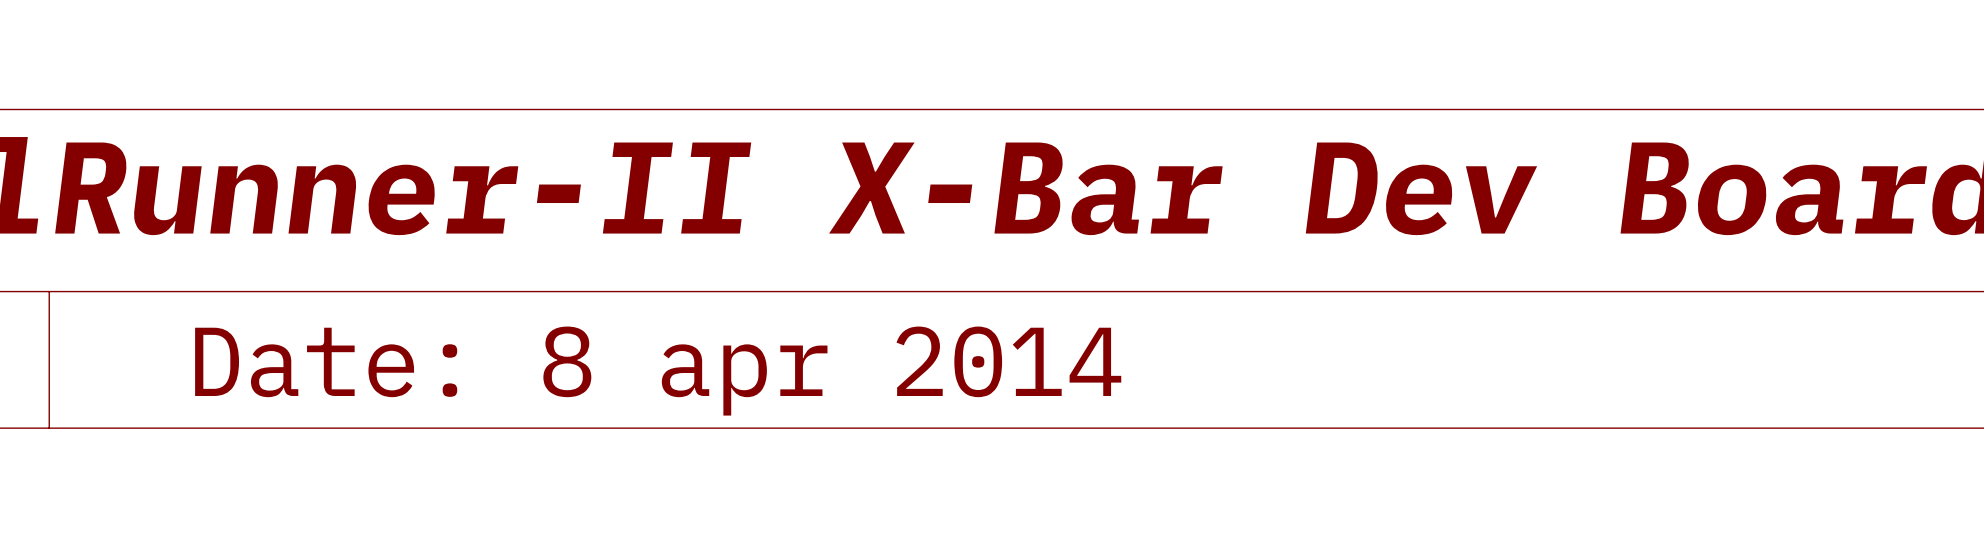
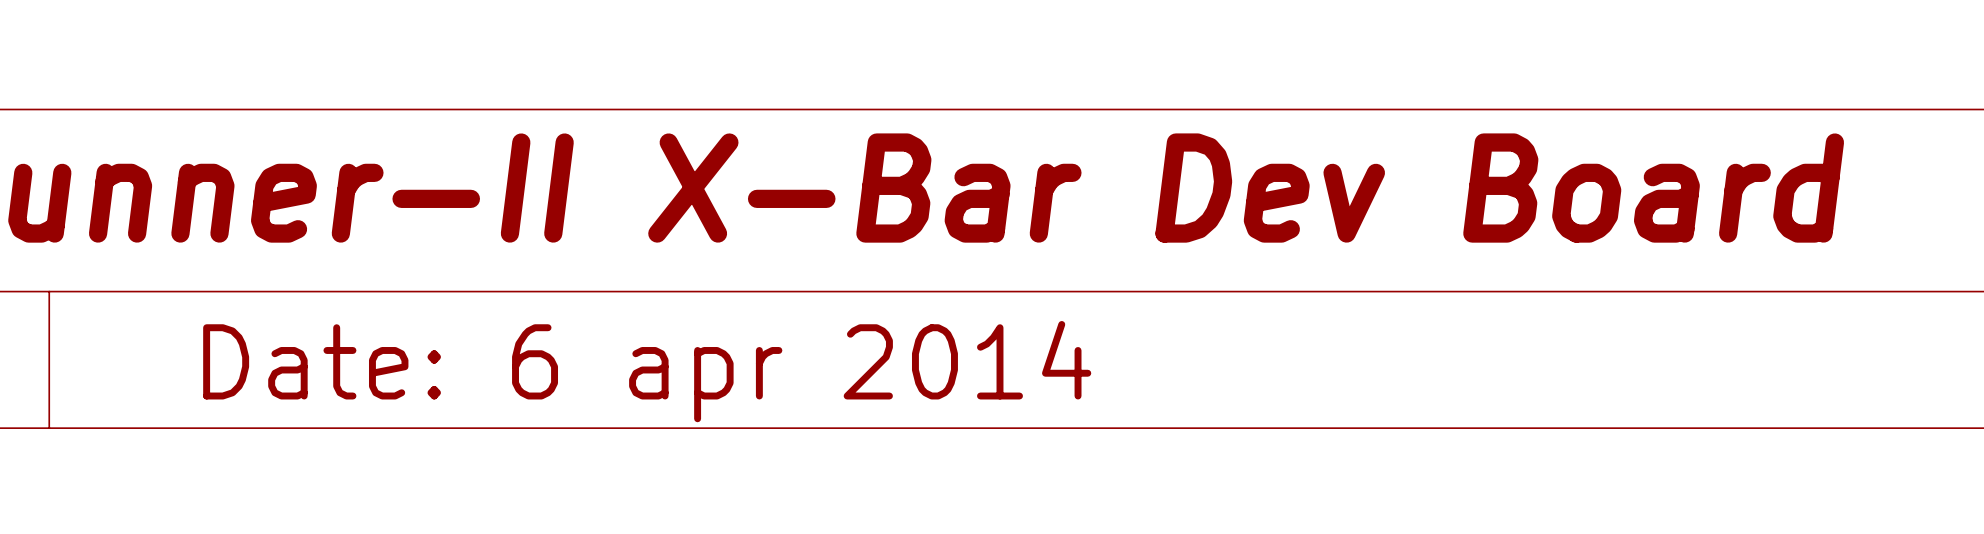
title block: Date: 8 apr 2014 (658, 371) -> Date: 6 apr 2014 (647, 371)

